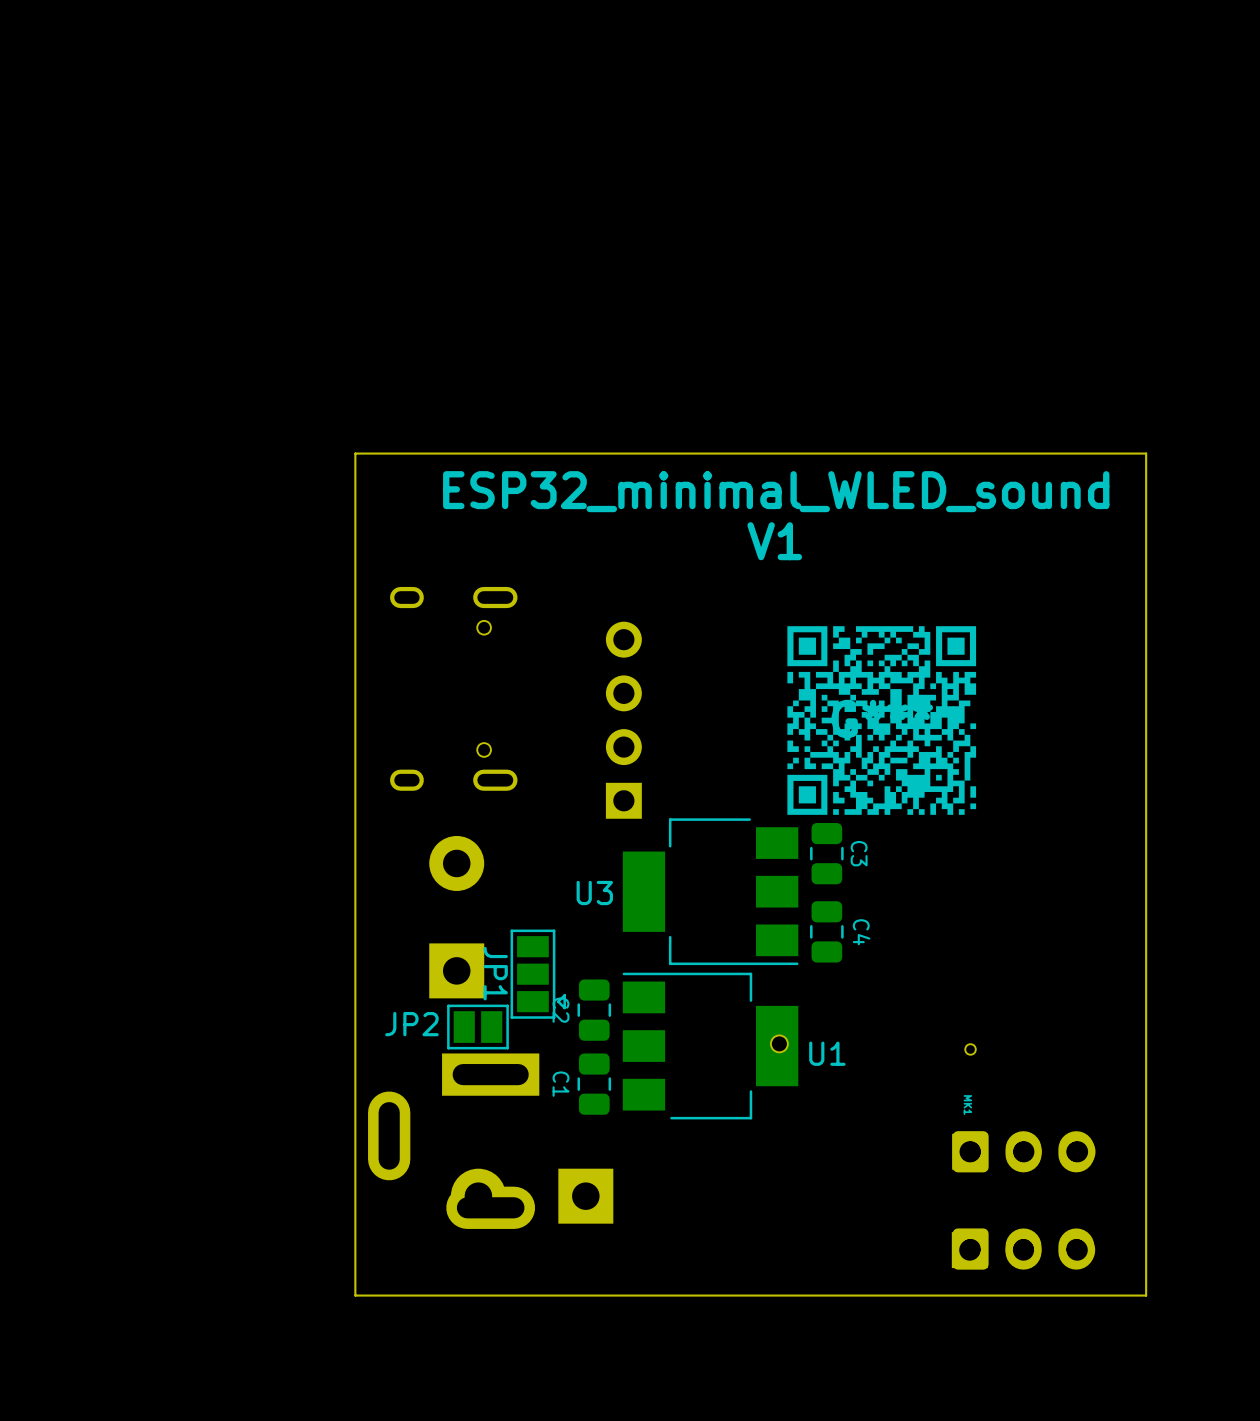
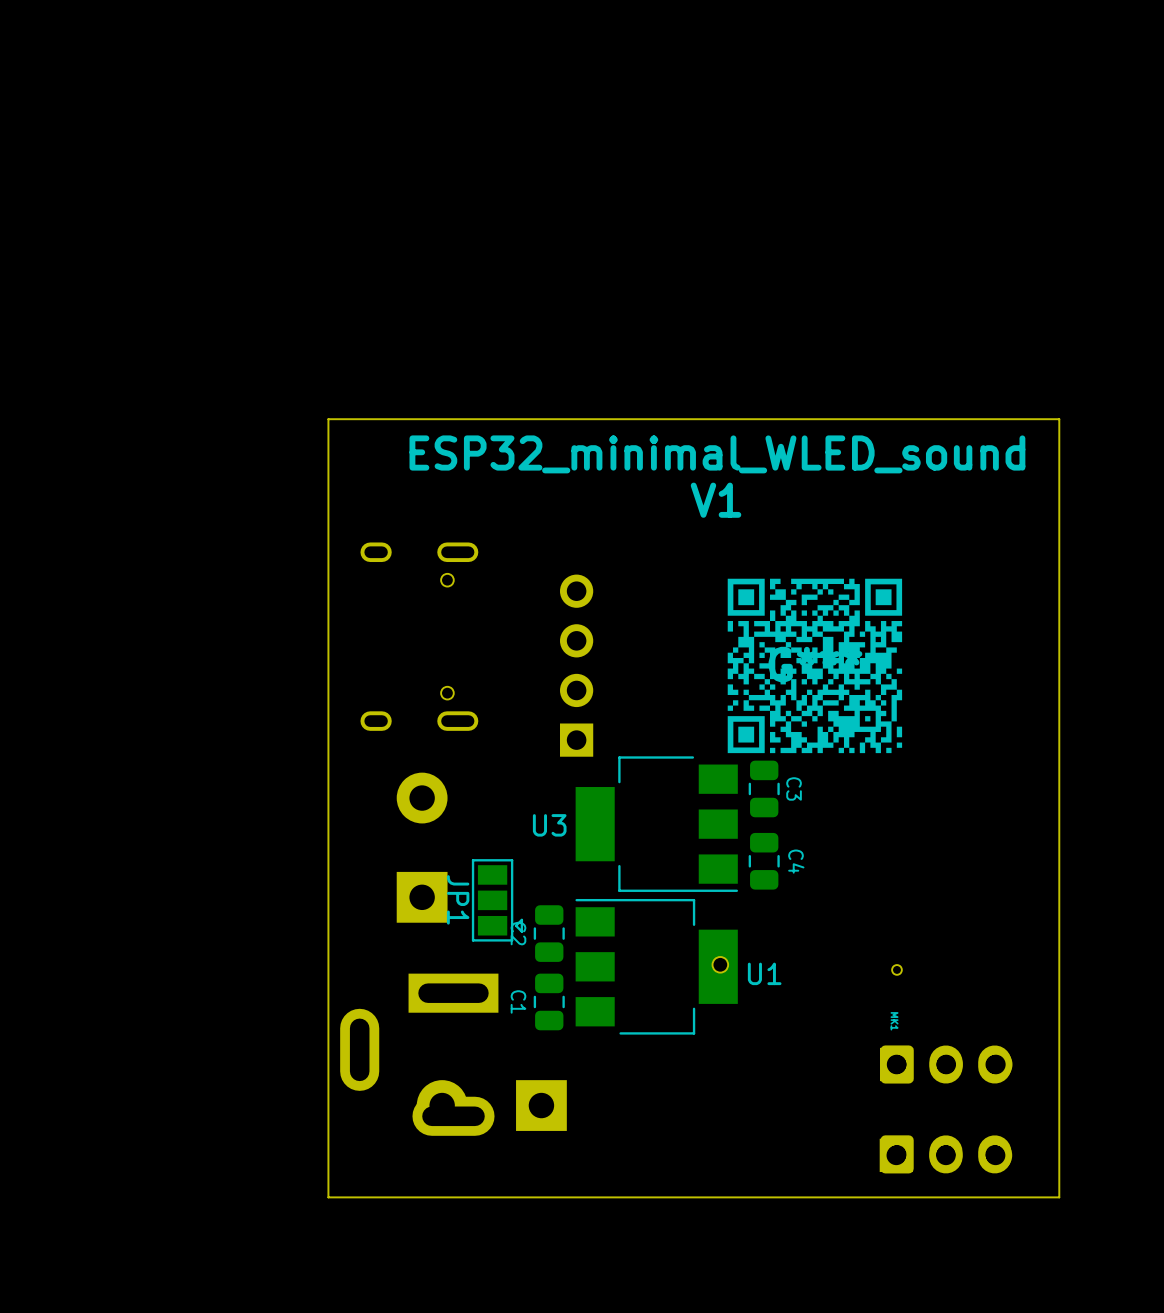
JP2: (477, 1027) -> none

